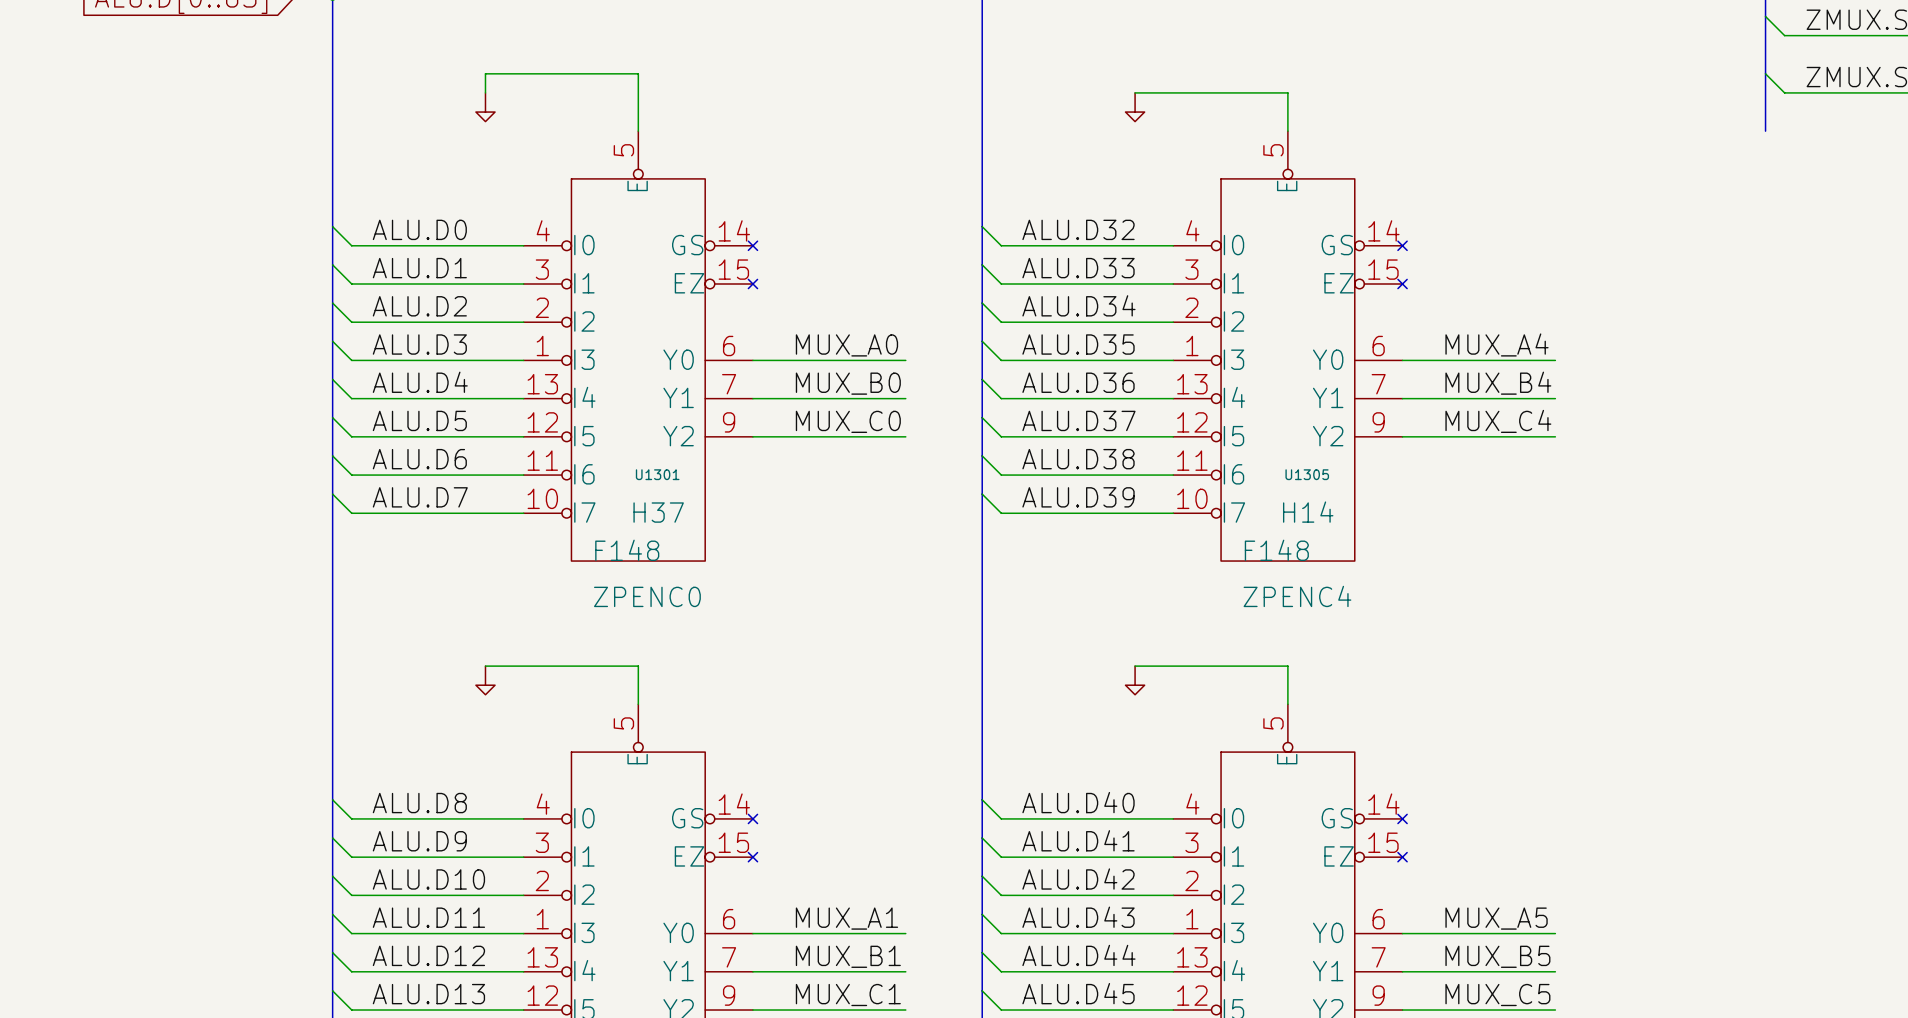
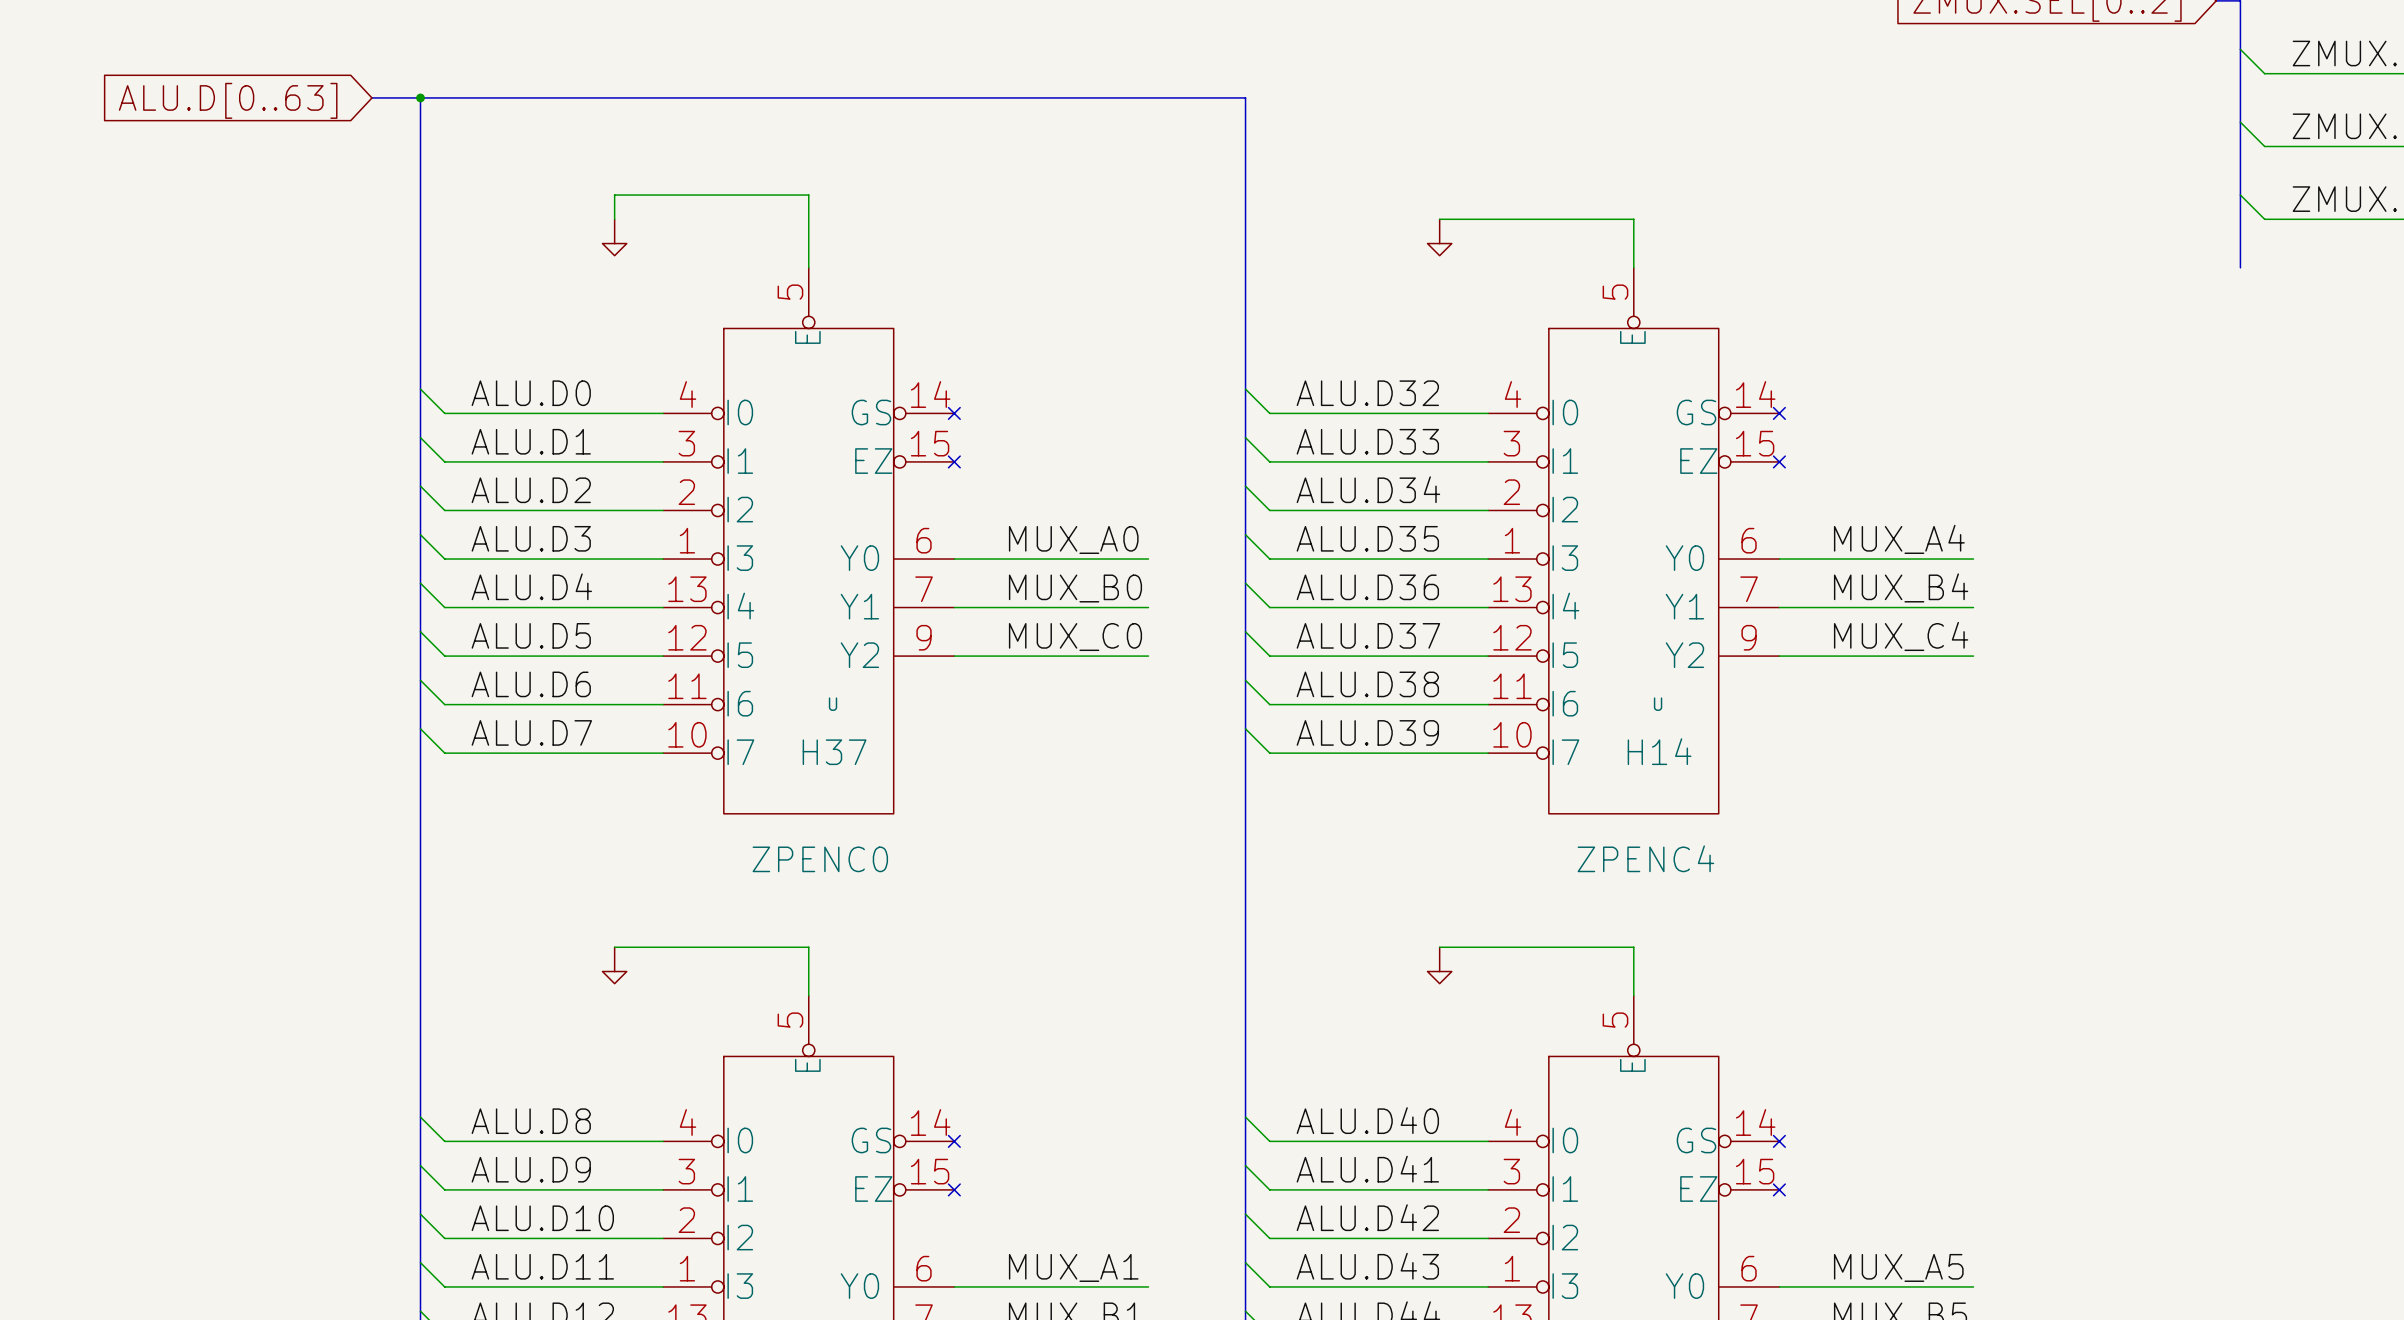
U1301 name: U1301 (657, 474) -> U (833, 704)
U1305 name: U1305 (1307, 474) -> U (1658, 704)
U1301 value: F148 (627, 550) -> none
U1305 value: F148 (1276, 550) -> none

